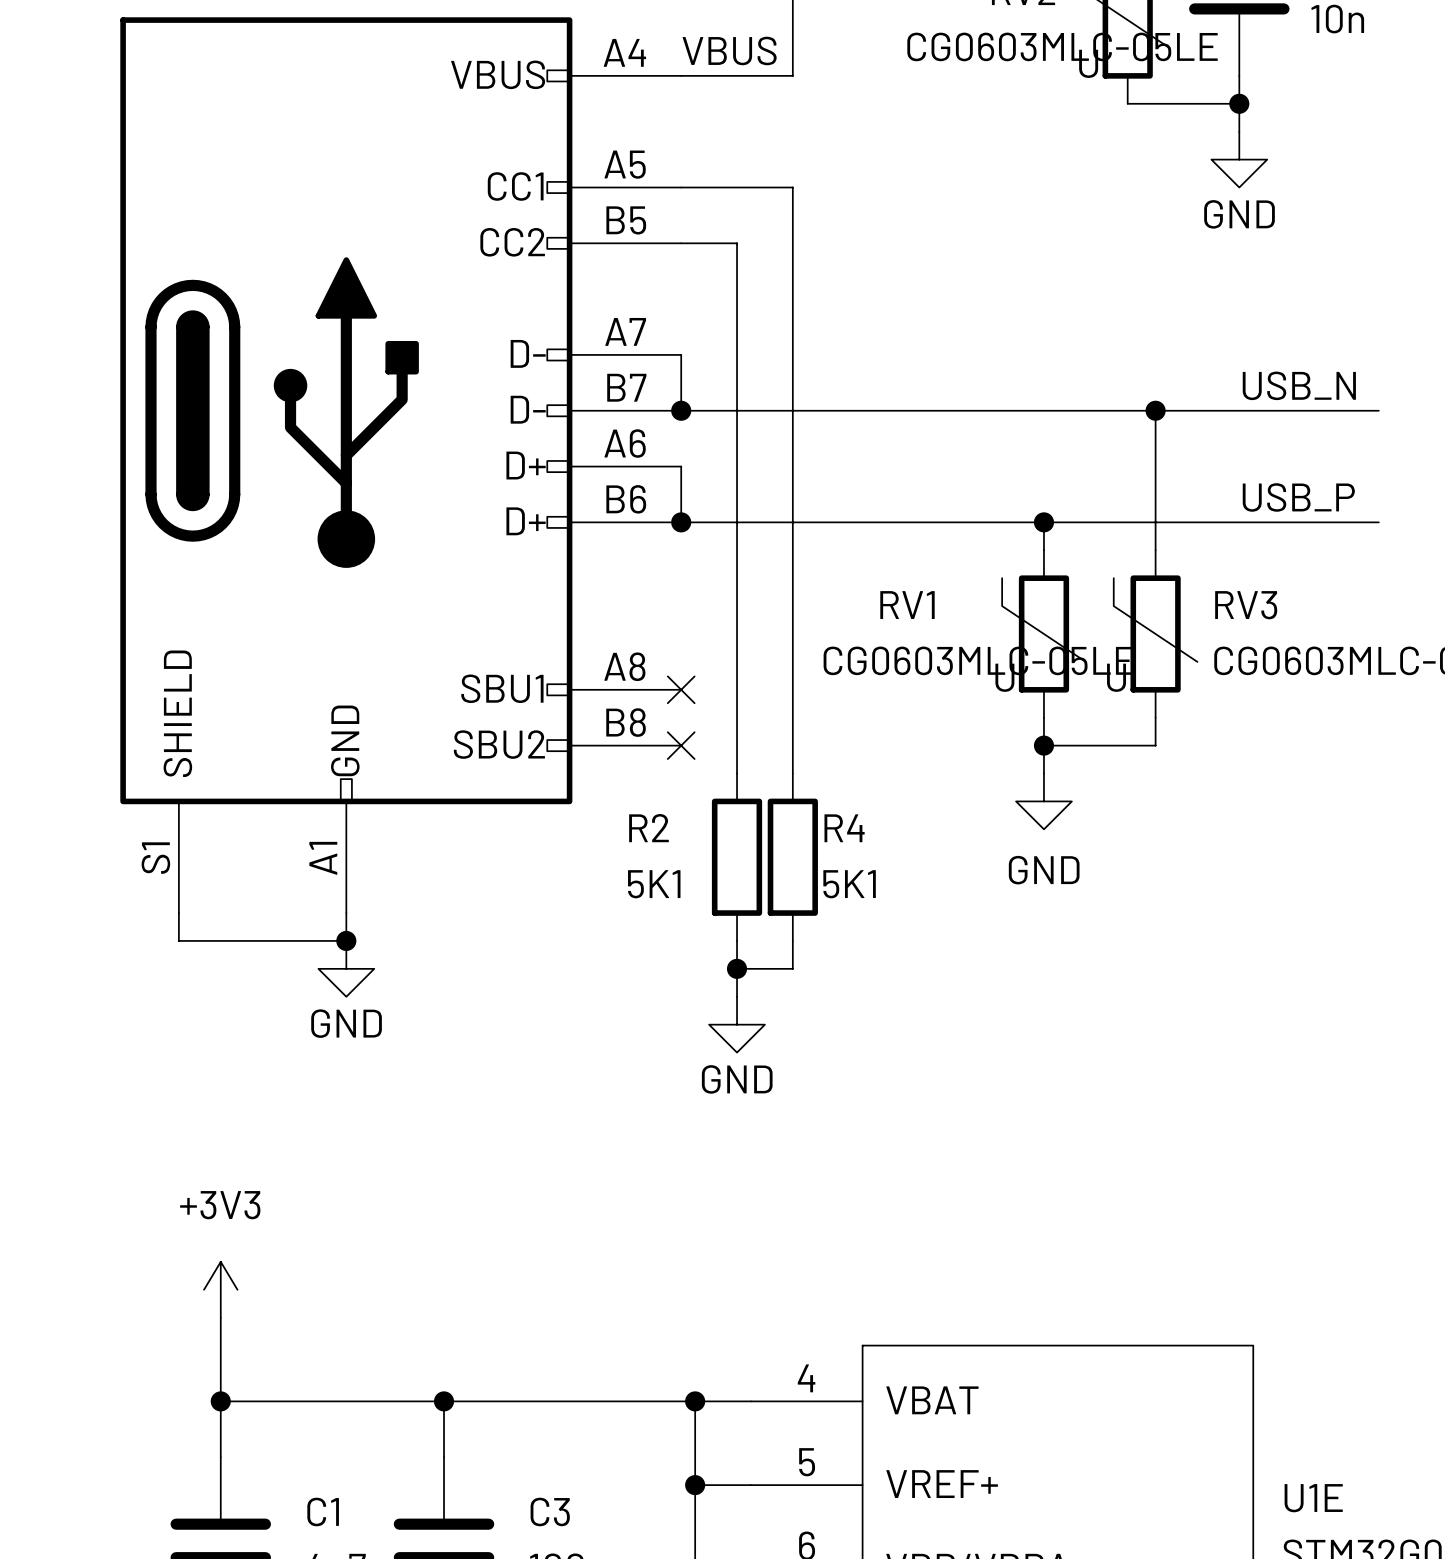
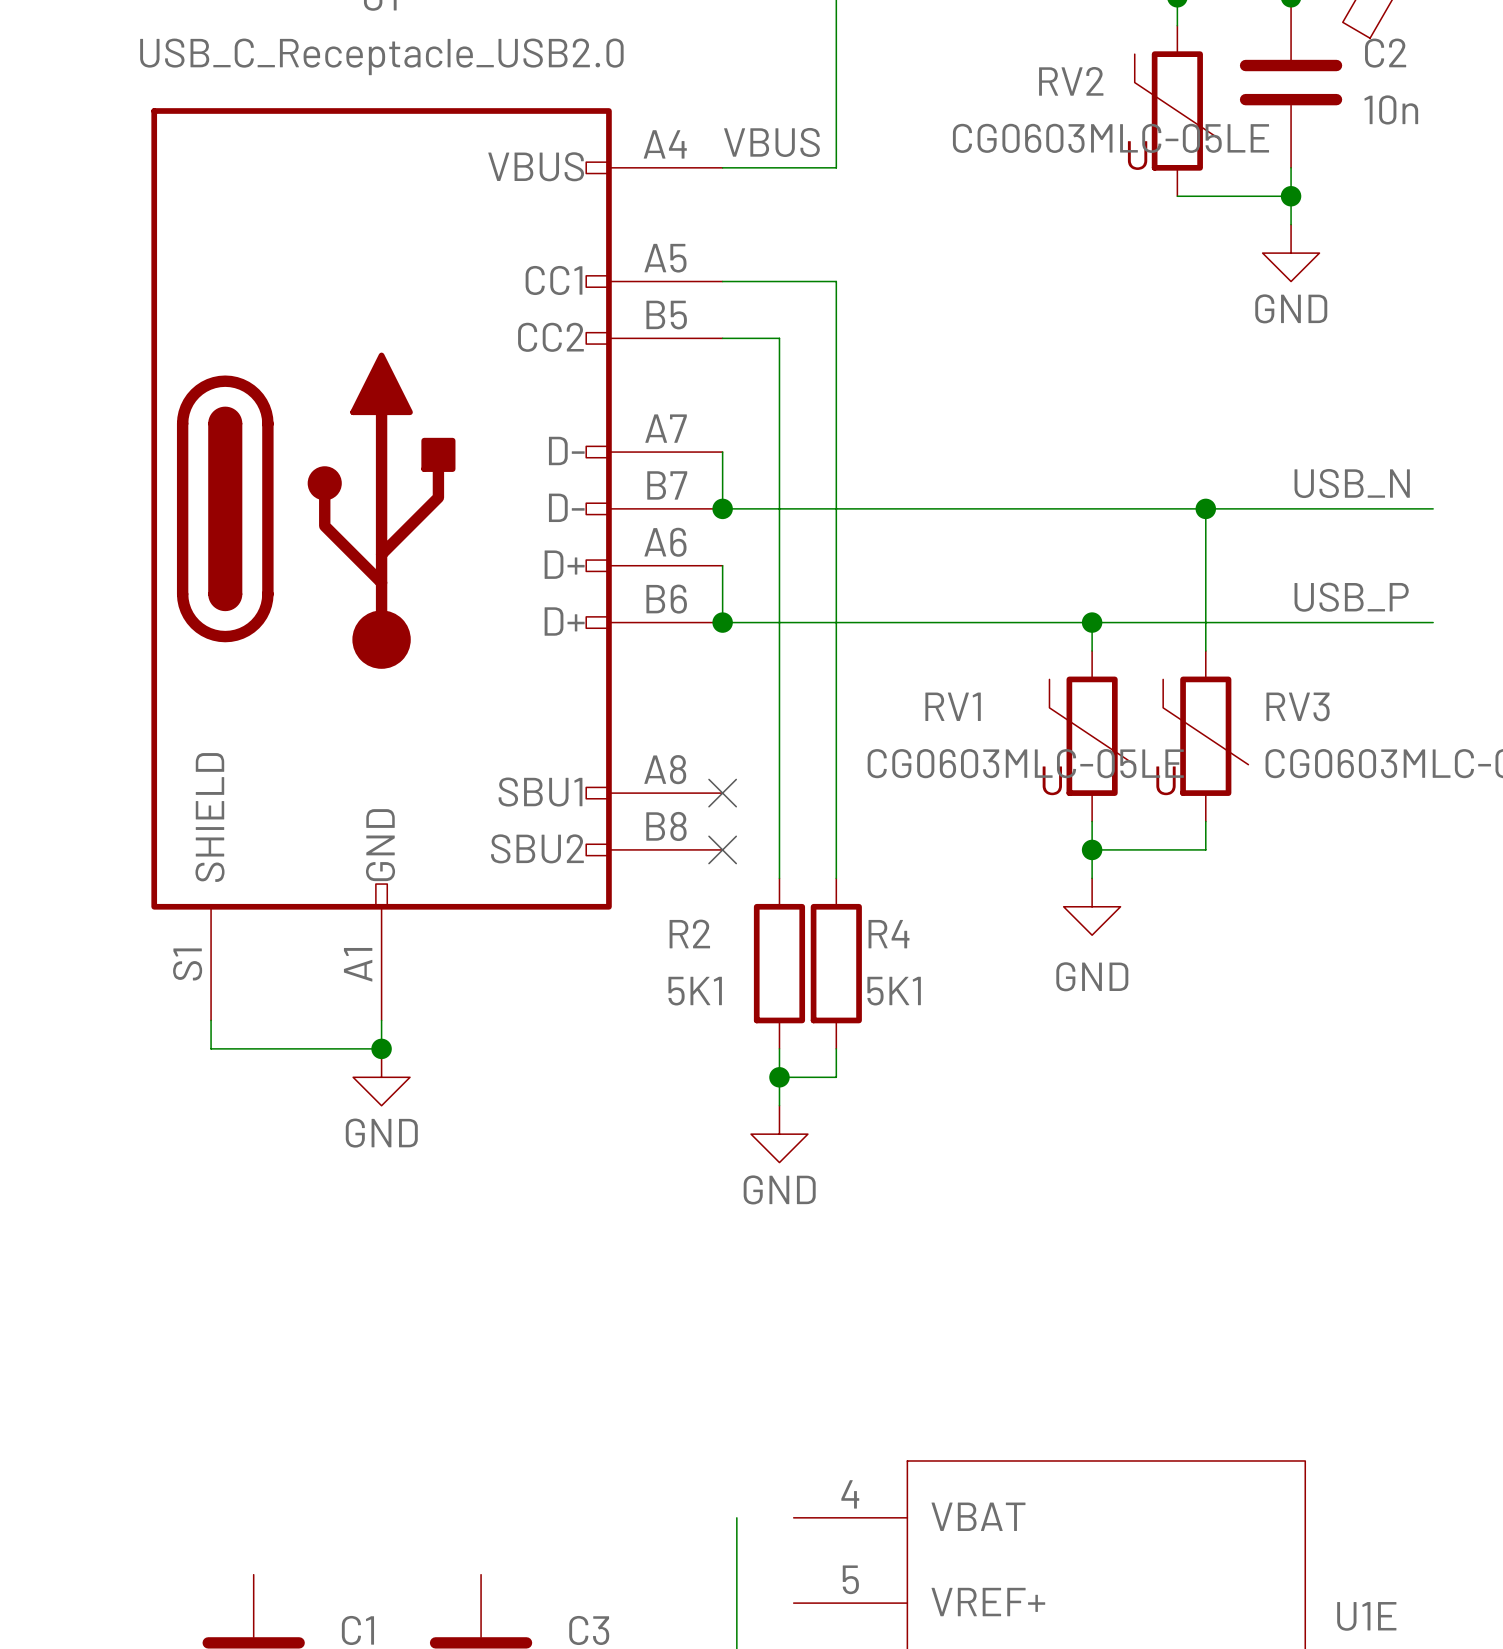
power symbol: +3V3 (220, 1289) -> none
wire: (220, 1317) (220, 1457) -> none
wire: (220, 1401) (750, 1401) -> none
junction: (220, 1401) -> none
wire: (444, 1401) (444, 1457) -> none
junction: (444, 1401) -> none
junction: (695, 1401) -> none
wire: (695, 1485) (750, 1485) -> none
junction: (695, 1485) -> none

